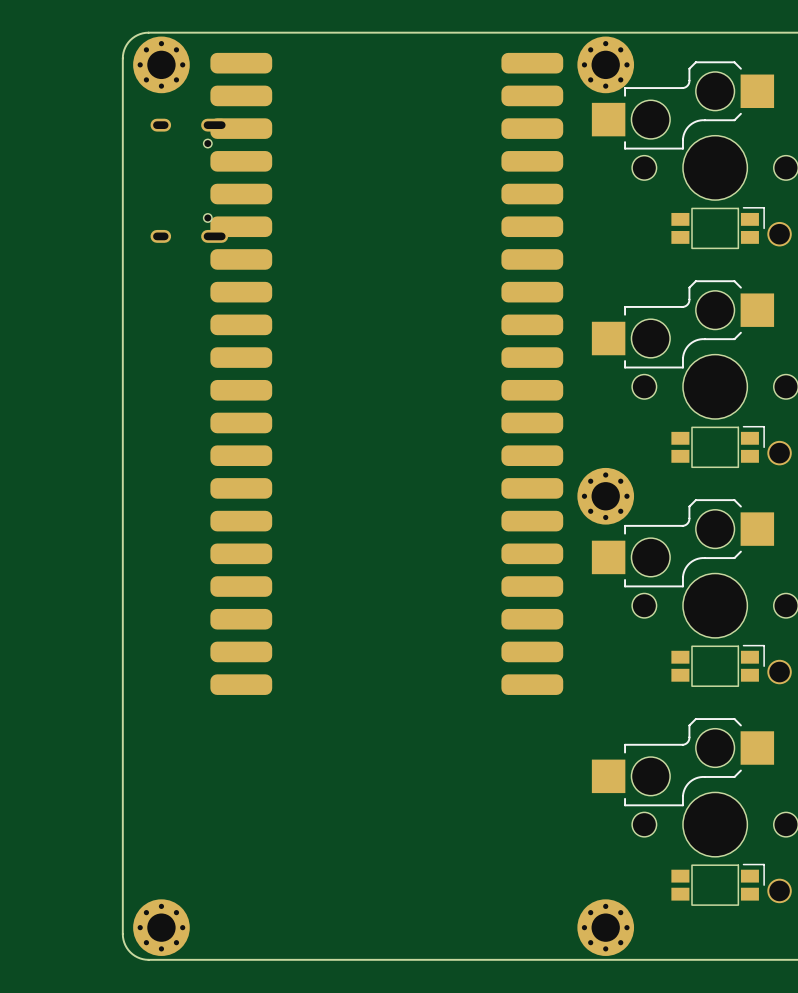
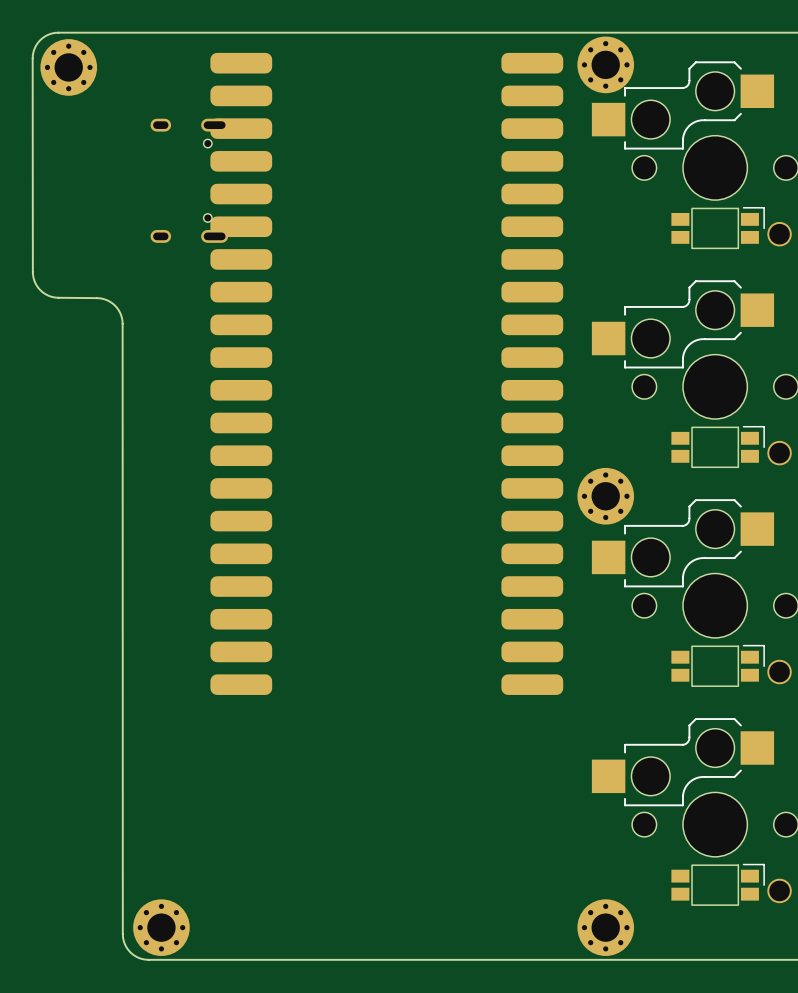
board edge: (148, 32) (137, 35) (130, 40) (124, 49) (122, 58) (122, 934) -> (148, 32) (52, 33) (38, 42) (32, 58) (34, 280) (42, 292) (52, 297) (99, 298) (108, 300) (117, 307) (122, 321) (122, 934)
part position: (161, 64) -> (68, 67)

